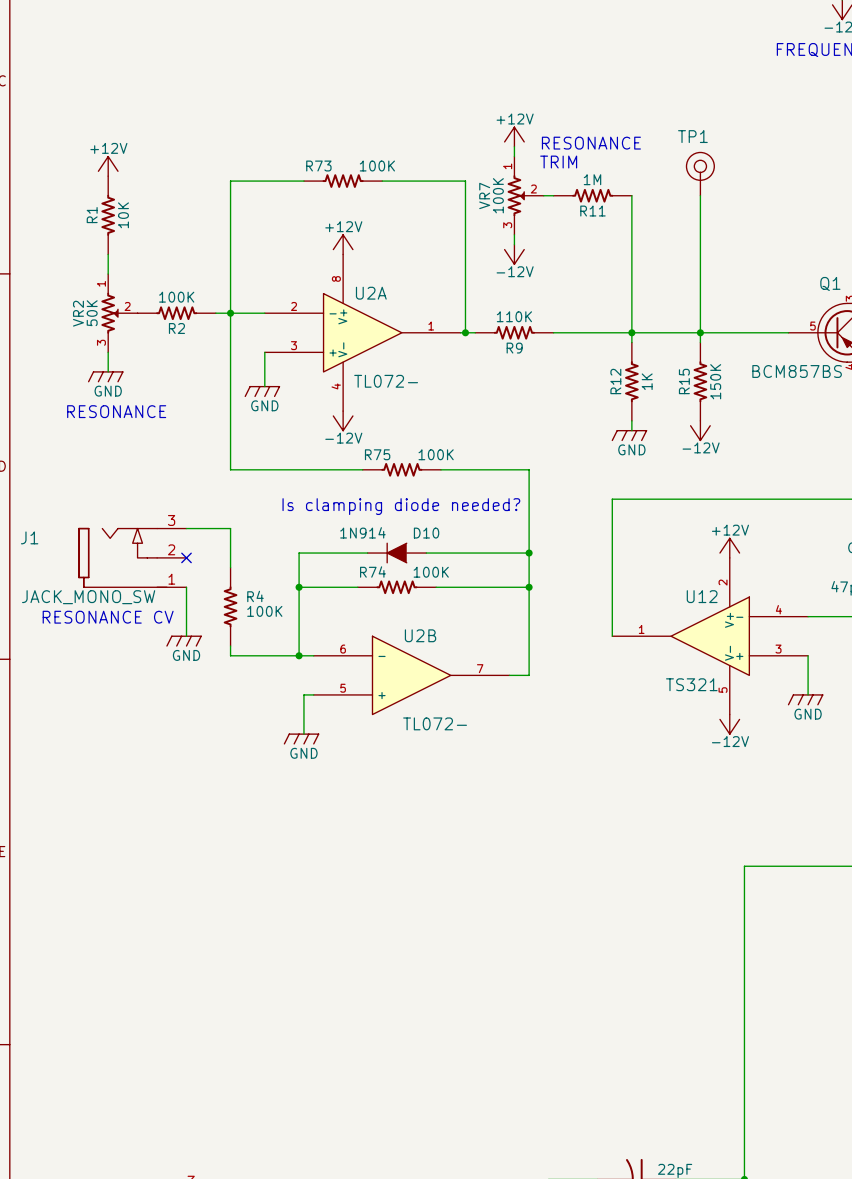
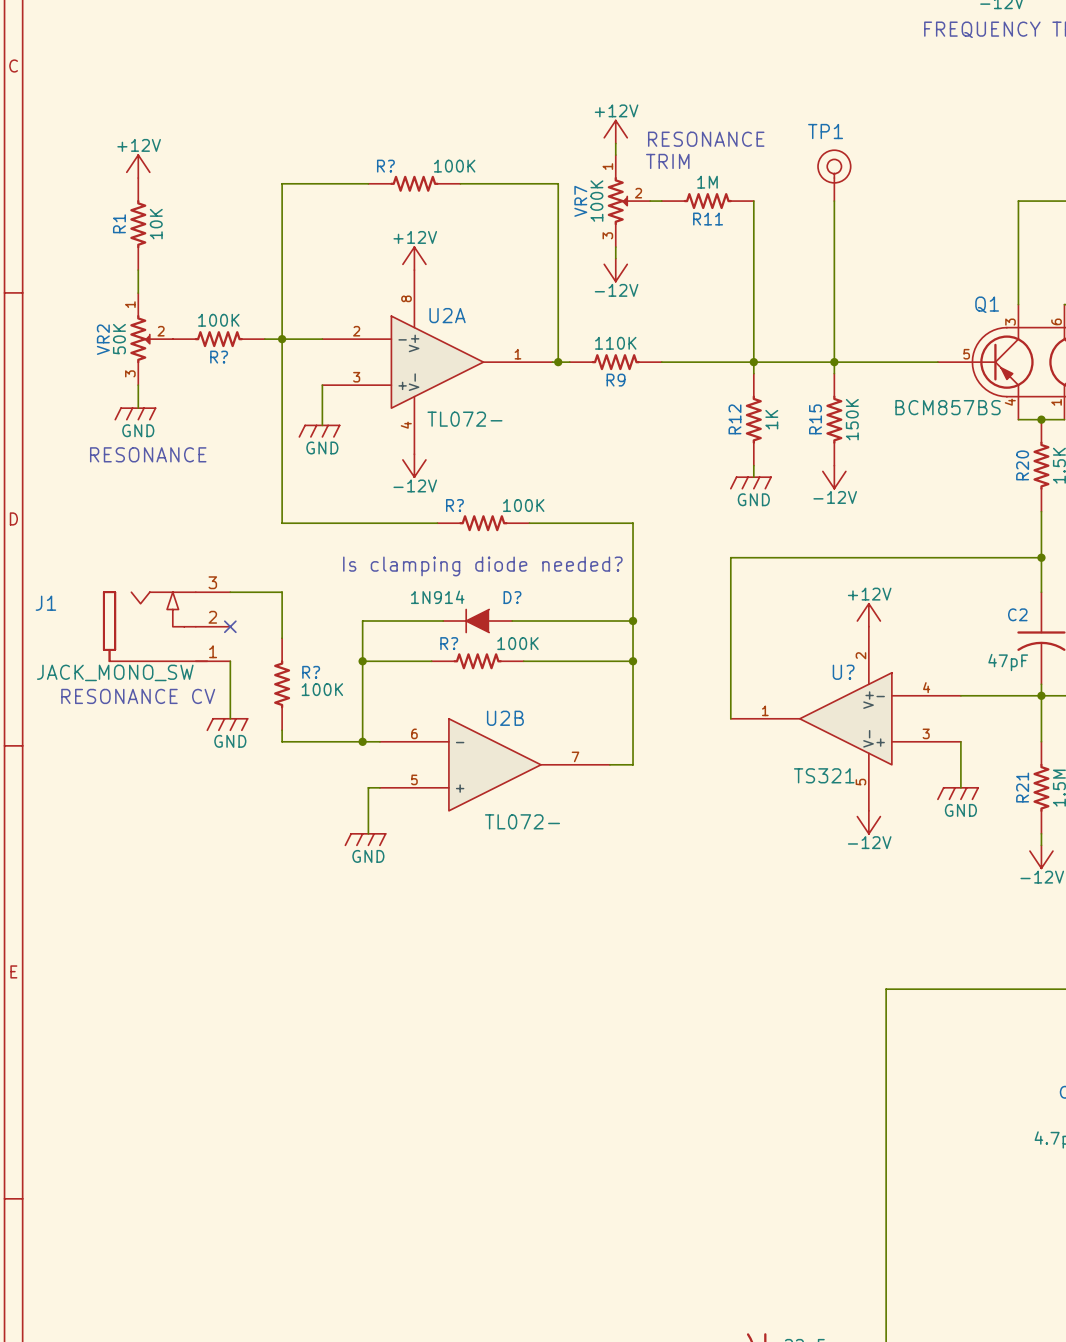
R73 name: R73 (318, 166) -> R? (385, 166)
R2 name: R2 (176, 328) -> R? (219, 357)
R75 name: R75 (377, 454) -> R? (454, 505)
D10 name: D10 (426, 533) -> D? (512, 597)
R74 name: R74 (372, 572) -> R? (449, 643)
R4 name: R4 (255, 596) -> R? (311, 672)
U12 name: U12 (702, 596) -> U? (843, 672)

